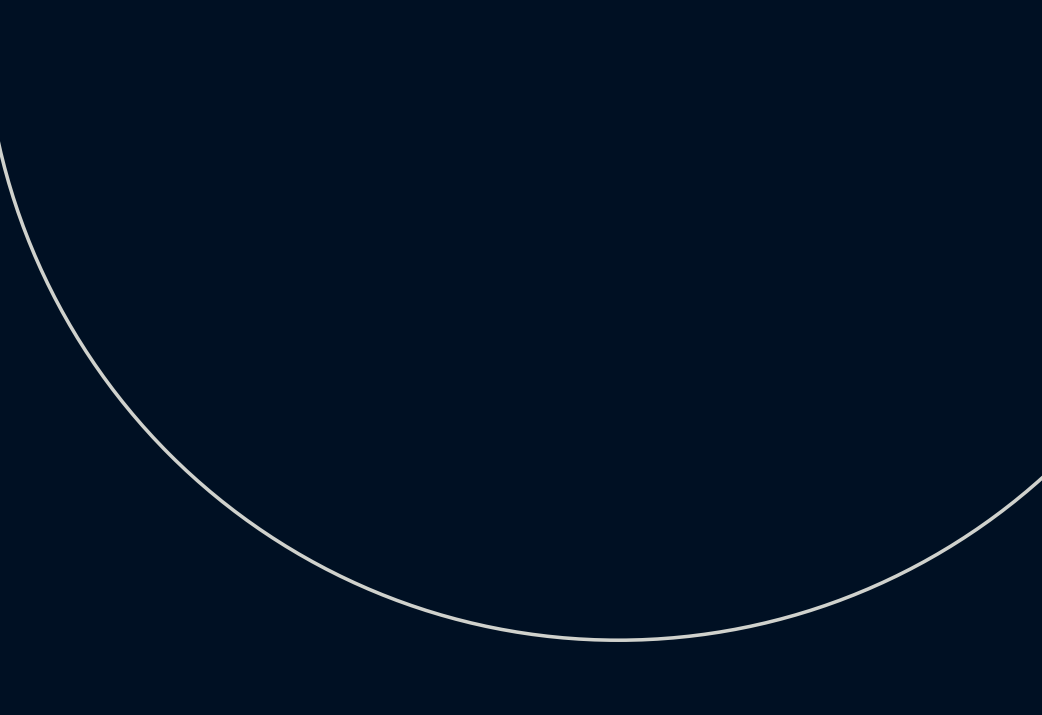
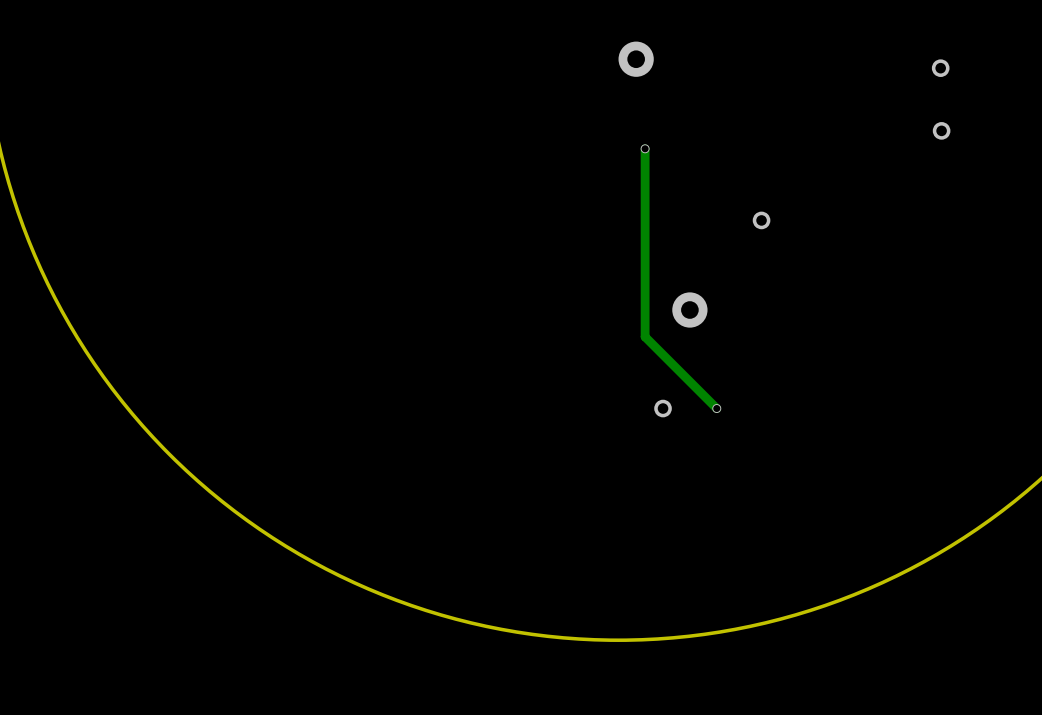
via: none -> (636, 59)
via: none -> (940, 68)
via: none -> (941, 130)
track: none -> (645, 148) (645, 336) (716, 408)
via: none -> (645, 148)
via: none -> (761, 220)
via: none -> (689, 310)
via: none -> (663, 408)
via: none -> (716, 408)

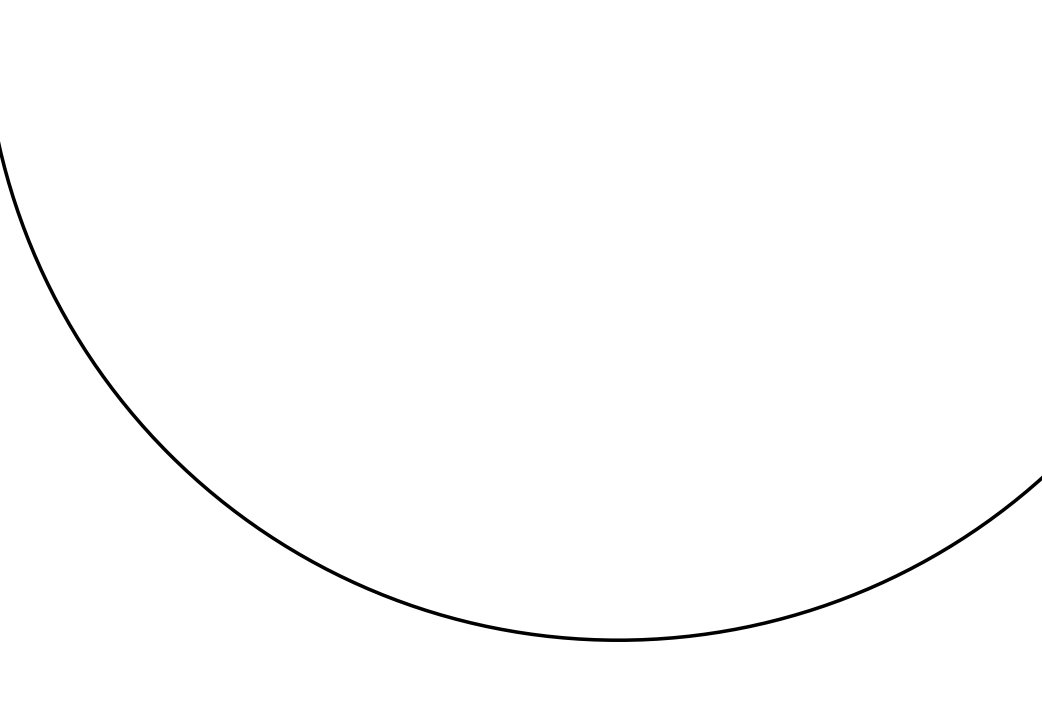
via: (636, 59) -> none
via: (940, 68) -> none
via: (941, 130) -> none
track: (645, 148) (645, 336) (716, 408) -> none
via: (645, 148) -> none
via: (761, 220) -> none
via: (689, 310) -> none
via: (663, 408) -> none
via: (716, 408) -> none

